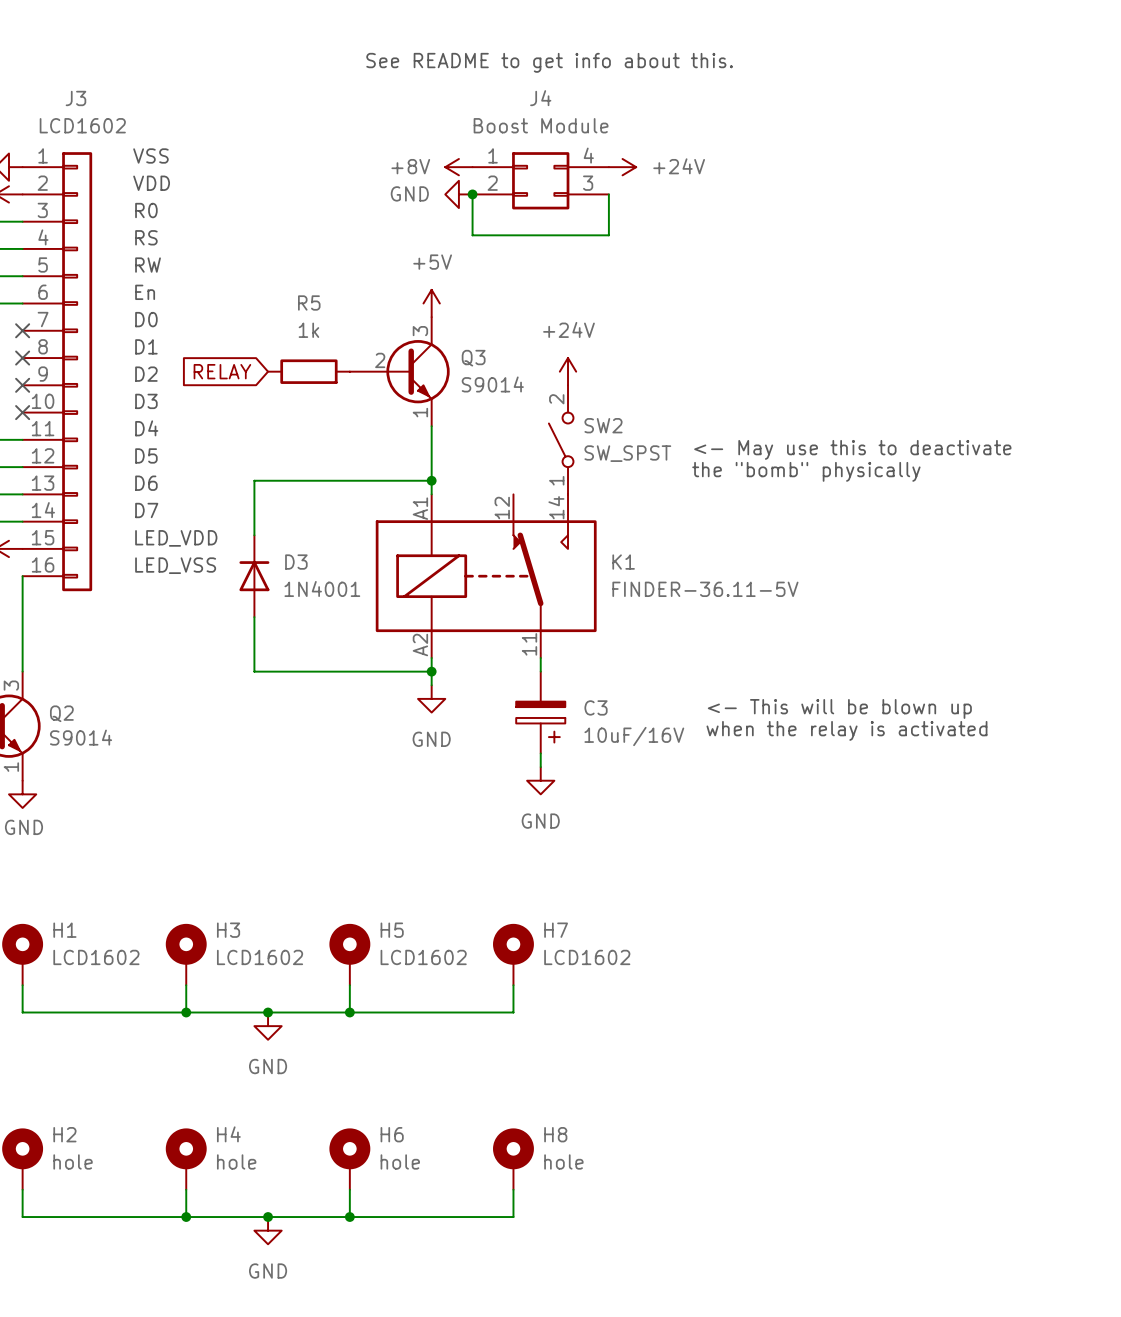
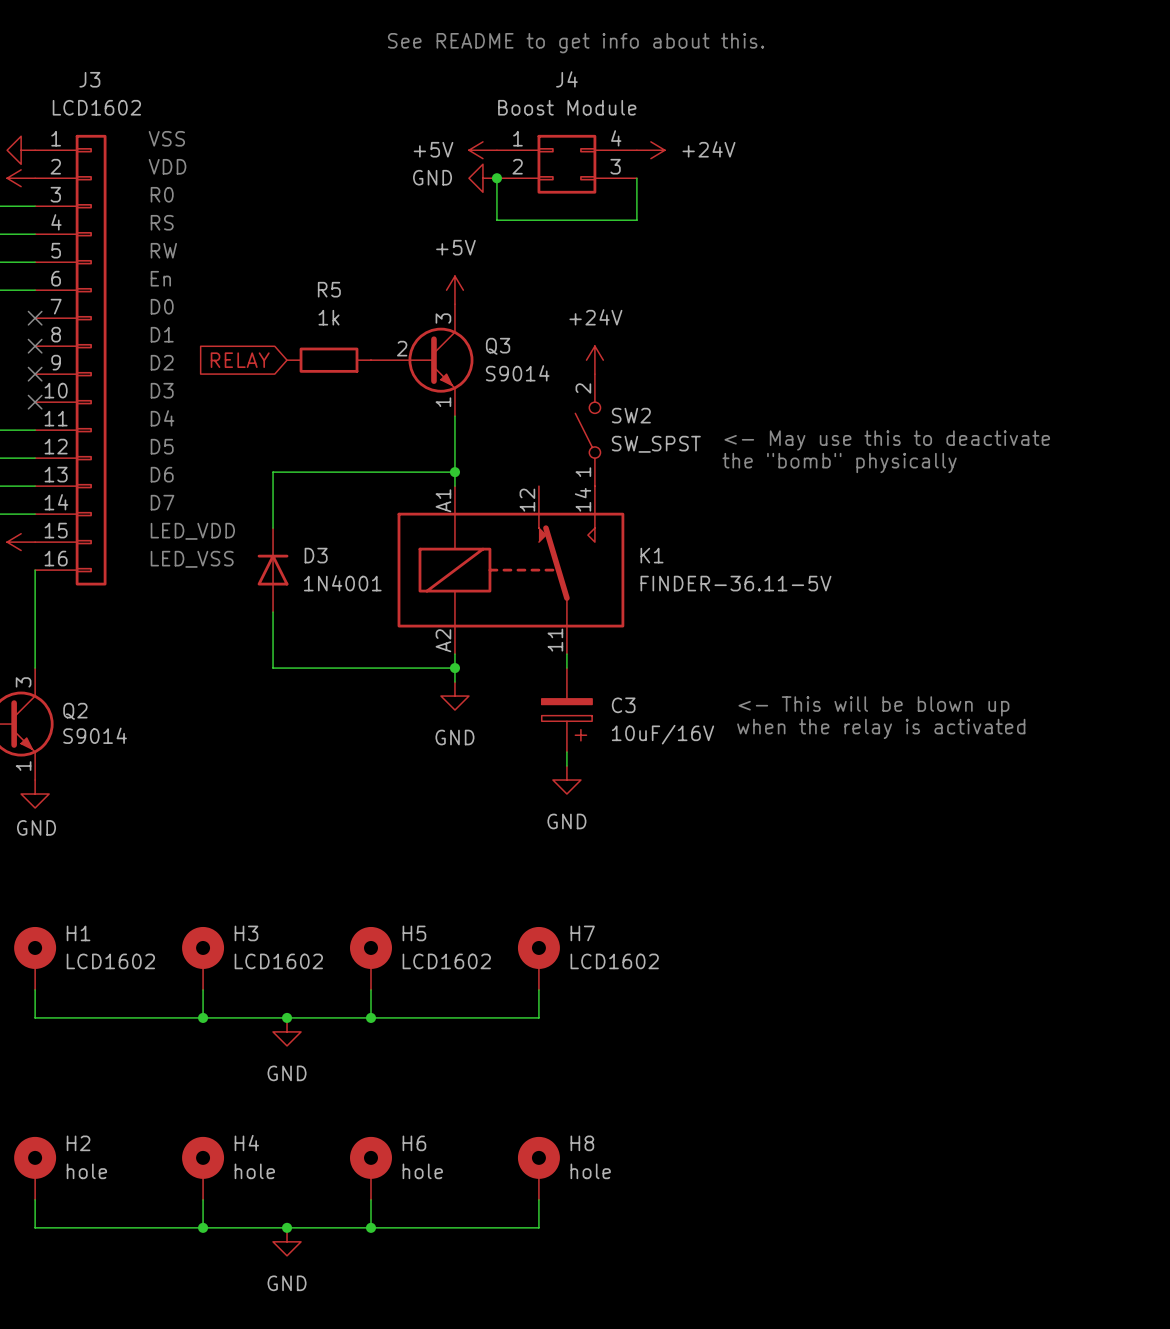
power symbol: +8V (458, 167) -> +5V (482, 150)

